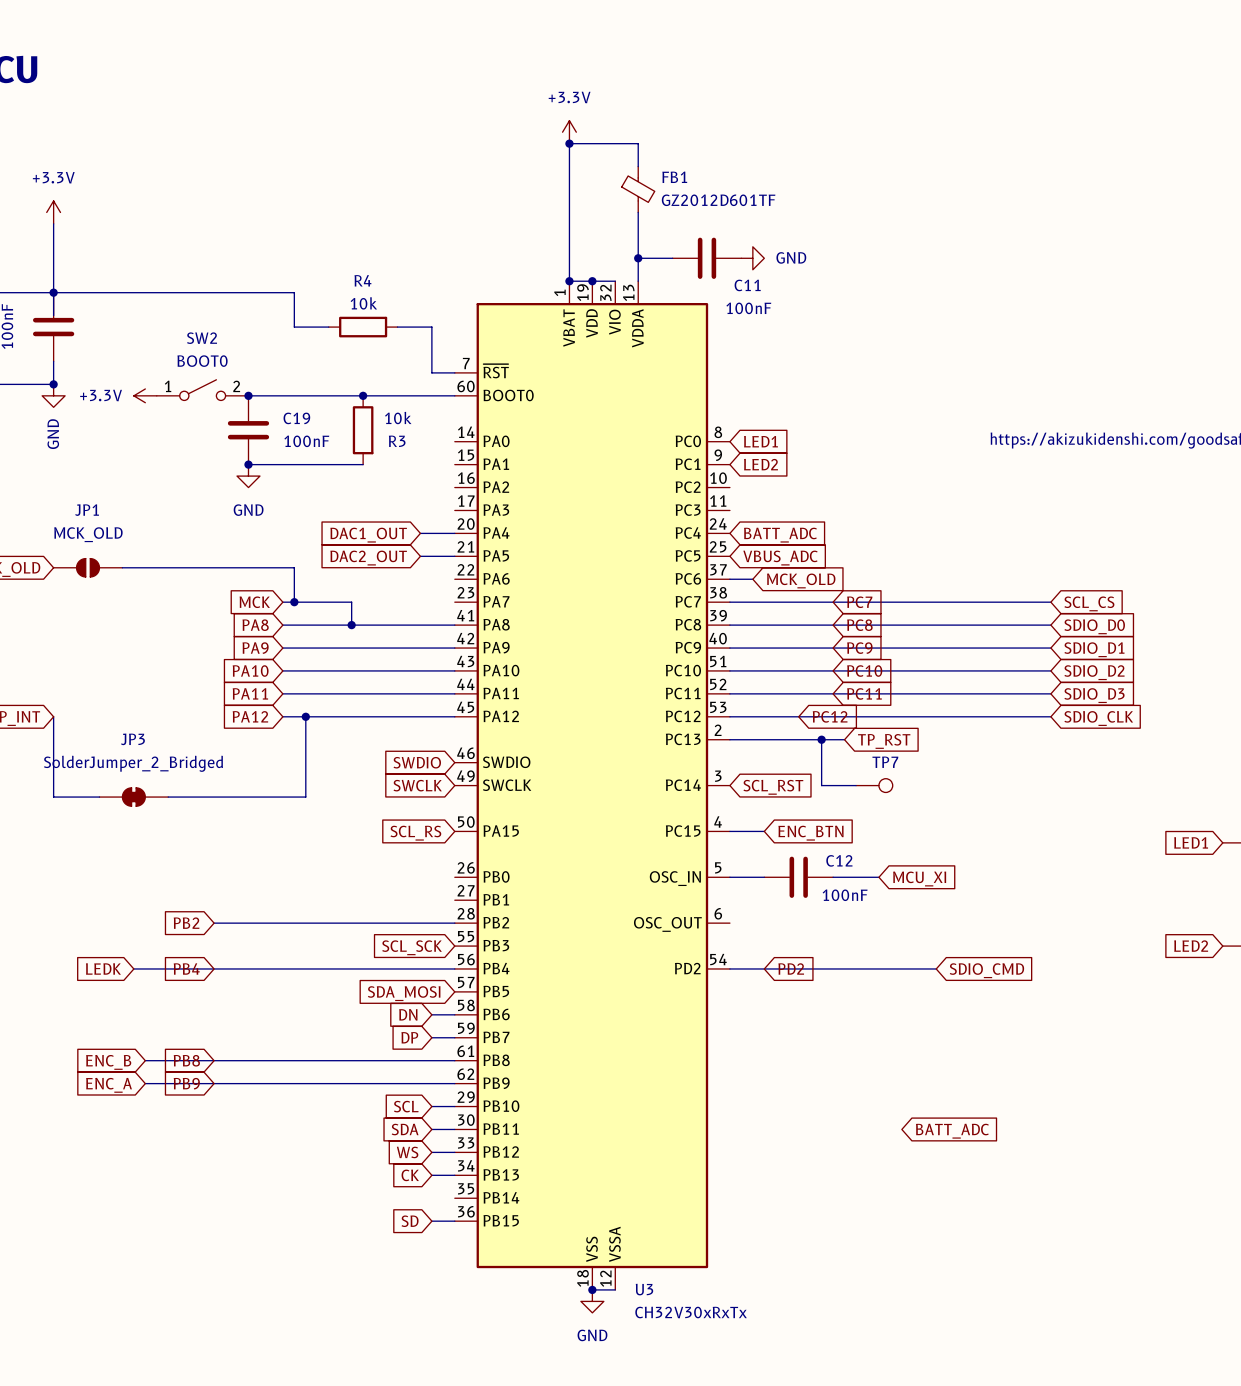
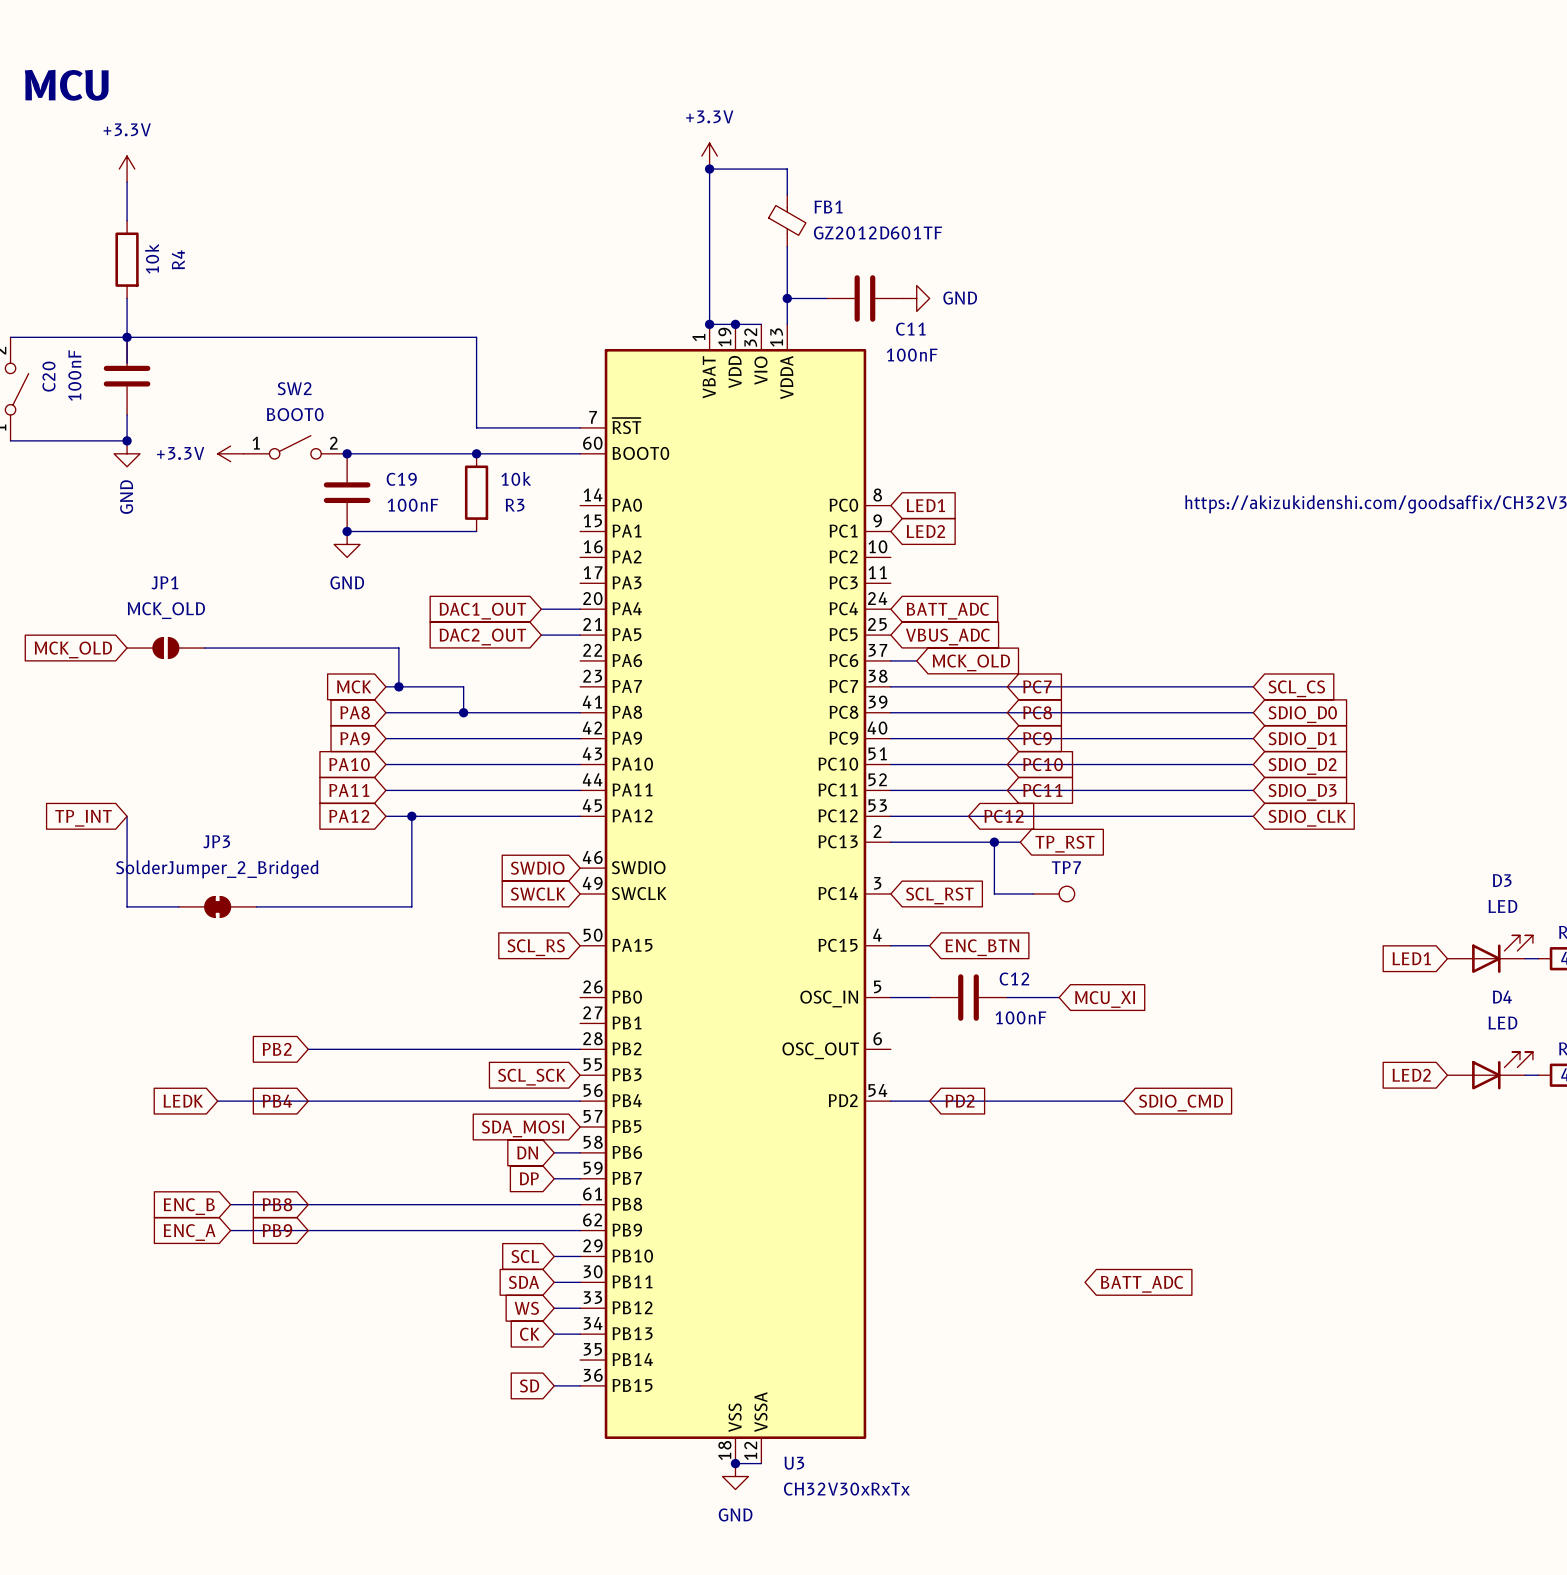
power symbol position: +3.3V (53, 212) -> +3.3V (127, 169)
wire: (53, 223) (53, 258) -> (127, 181) (127, 220)
wire: (294, 292) (294, 327) (328, 327) -> none
R4 rotation: 0° (363, 327) -> 90° clockwise (127, 259)
R4 position: (363, 327) -> (127, 259)
wire: (397, 327) (431, 327) (431, 372) -> (398, 337) (476, 337) (476, 427) (554, 427)

